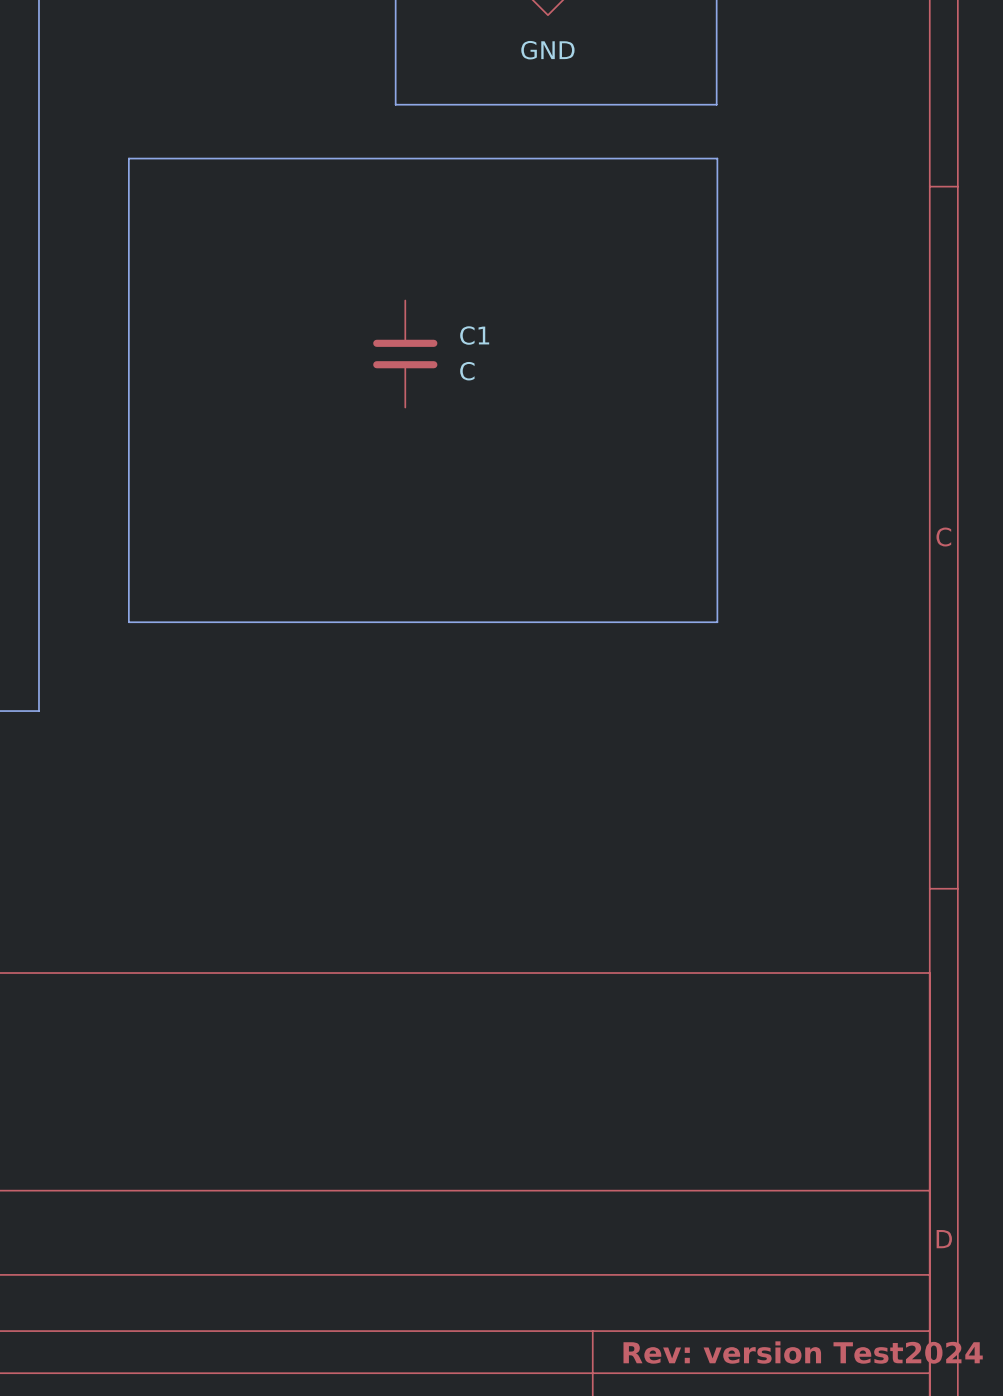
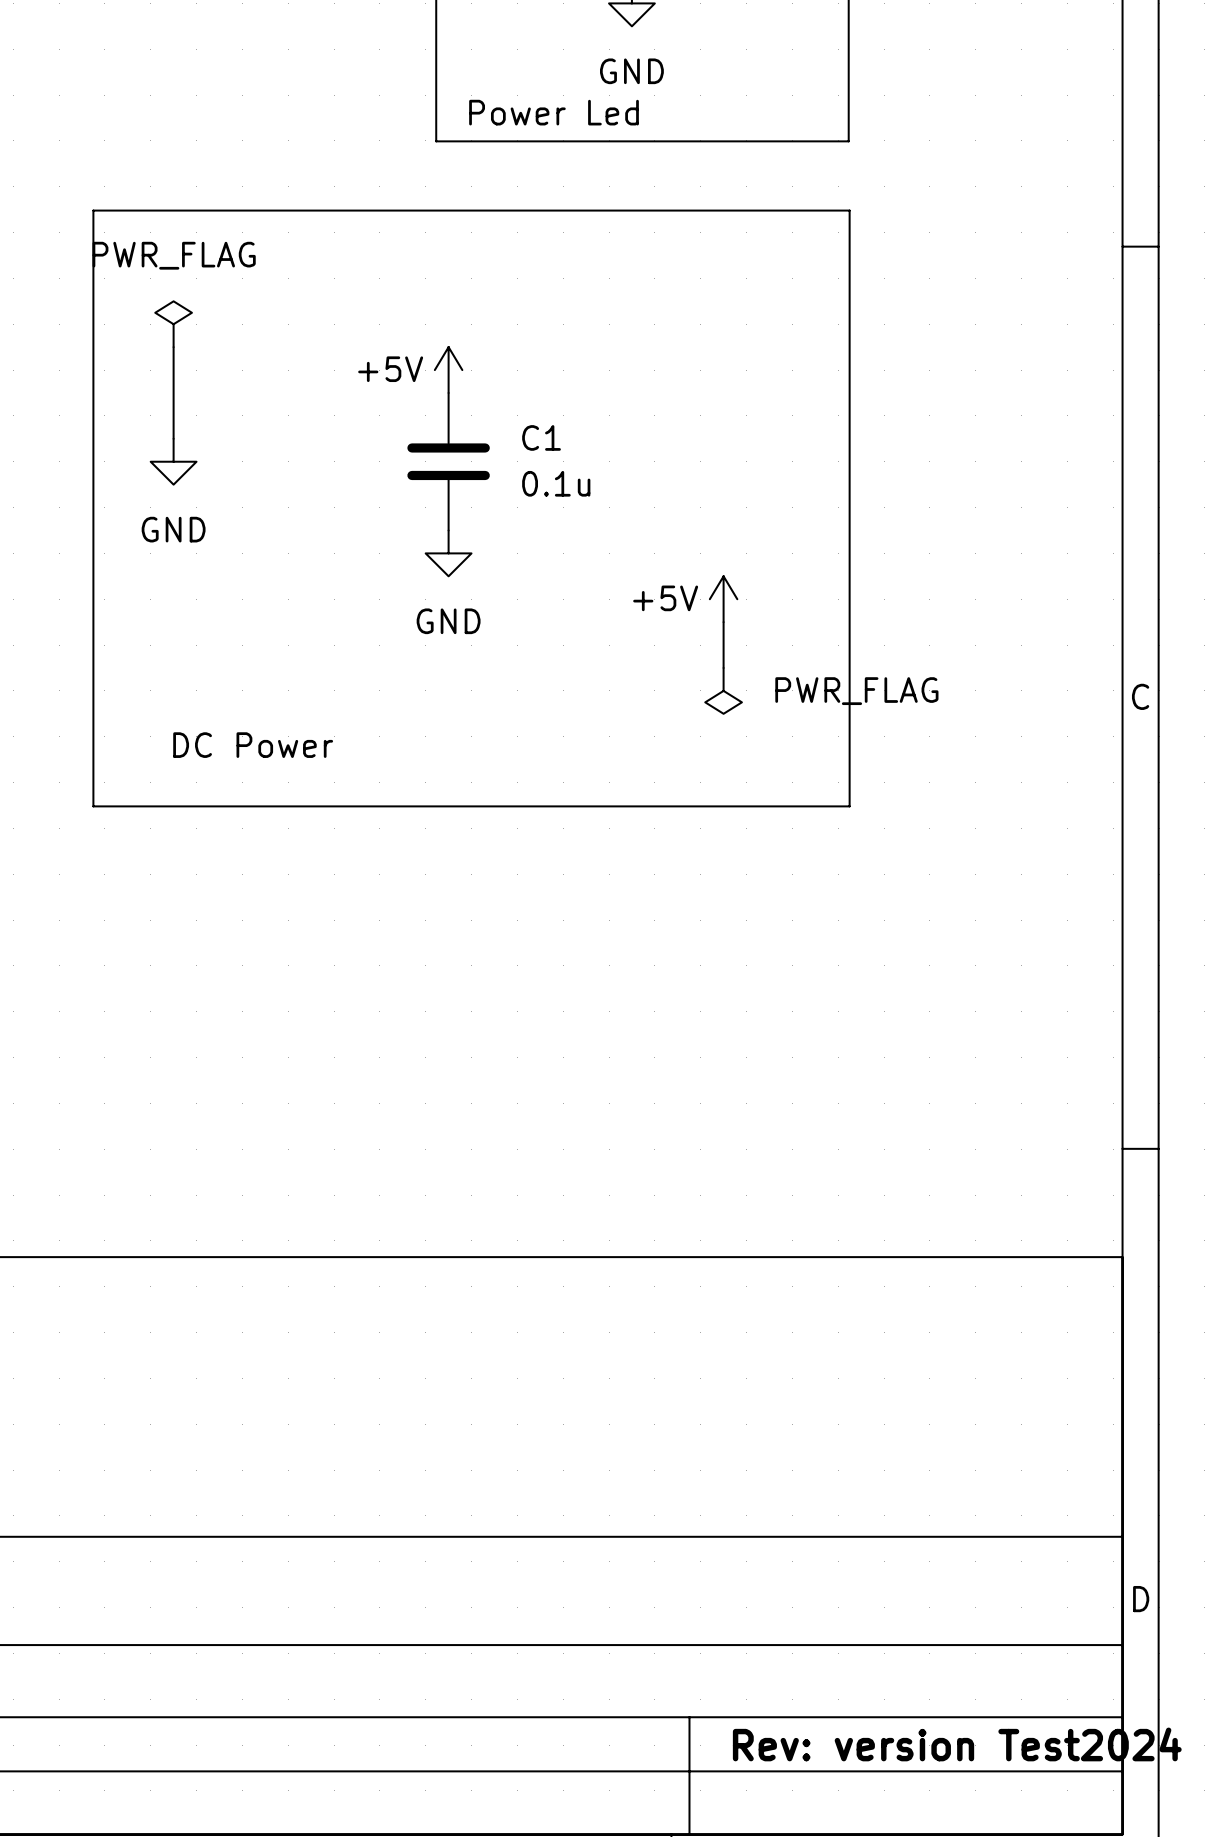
text: none -> Power Led (554, 112)
power symbol: none -> PWR_FLAG (173, 324)
wire: none -> (173, 347) (173, 438)
power symbol: none -> +5V (448, 370)
power symbol: none -> GND (173, 461)
C1 value: C (467, 371) -> 0.1u (556, 483)
power symbol: none -> GND (448, 553)
power symbol: none -> +5V (723, 599)
wire: none -> (723, 622) (723, 667)
power symbol: none -> PWR_FLAG (723, 690)
text: none -> DC Power (253, 745)

